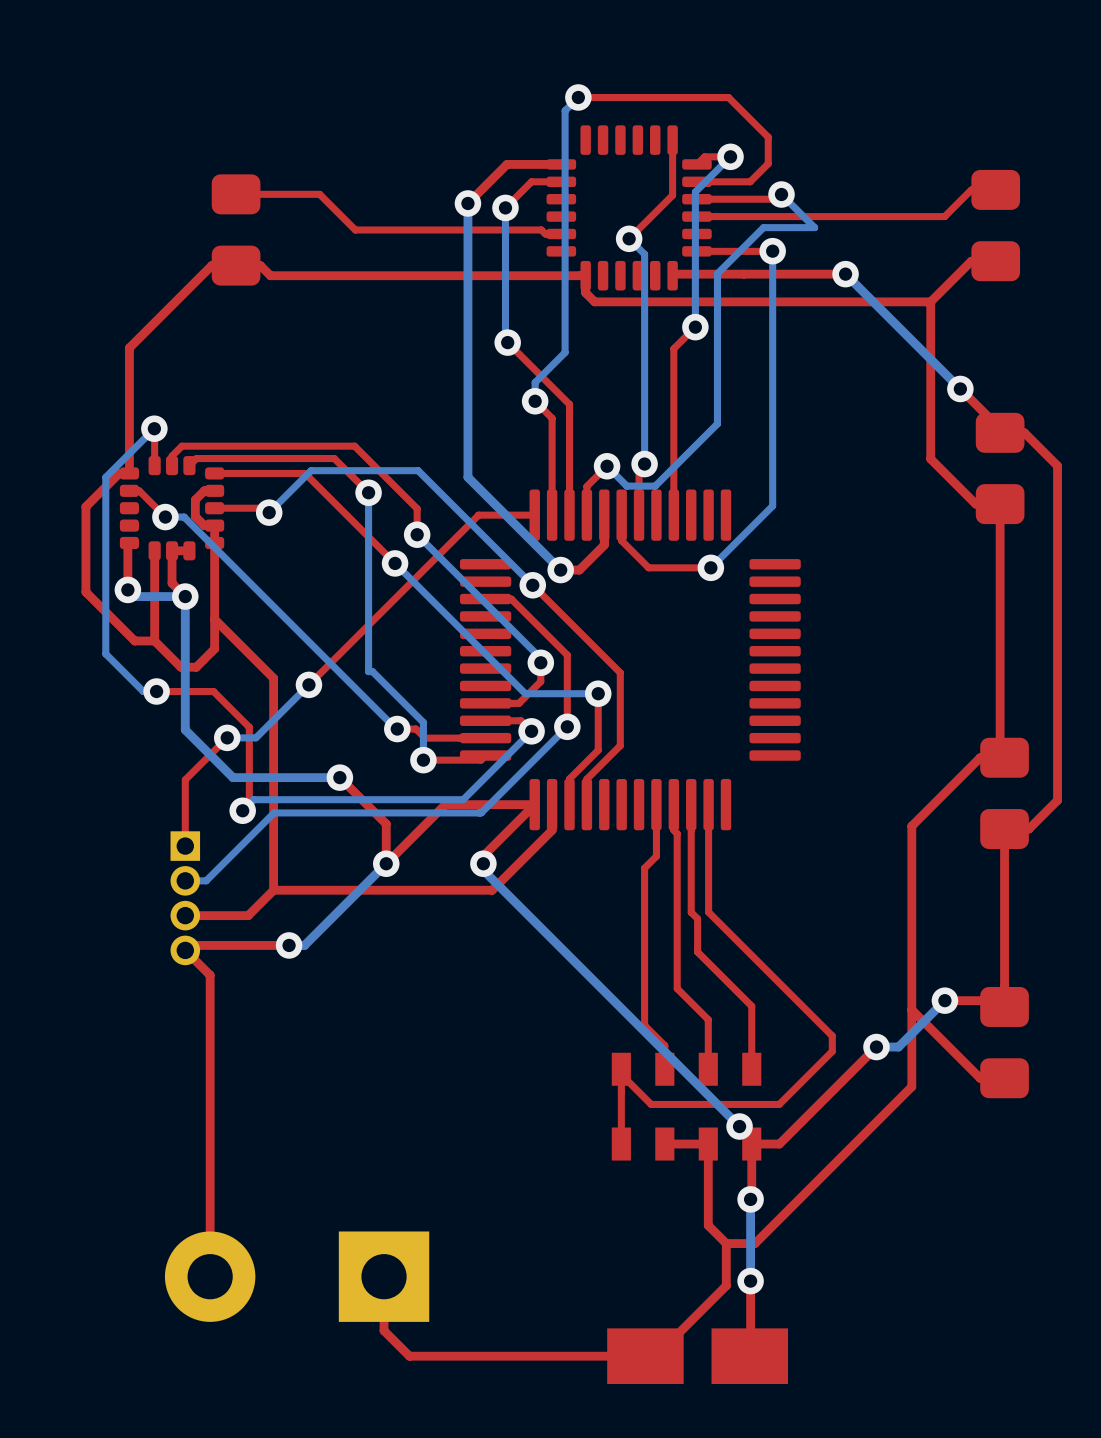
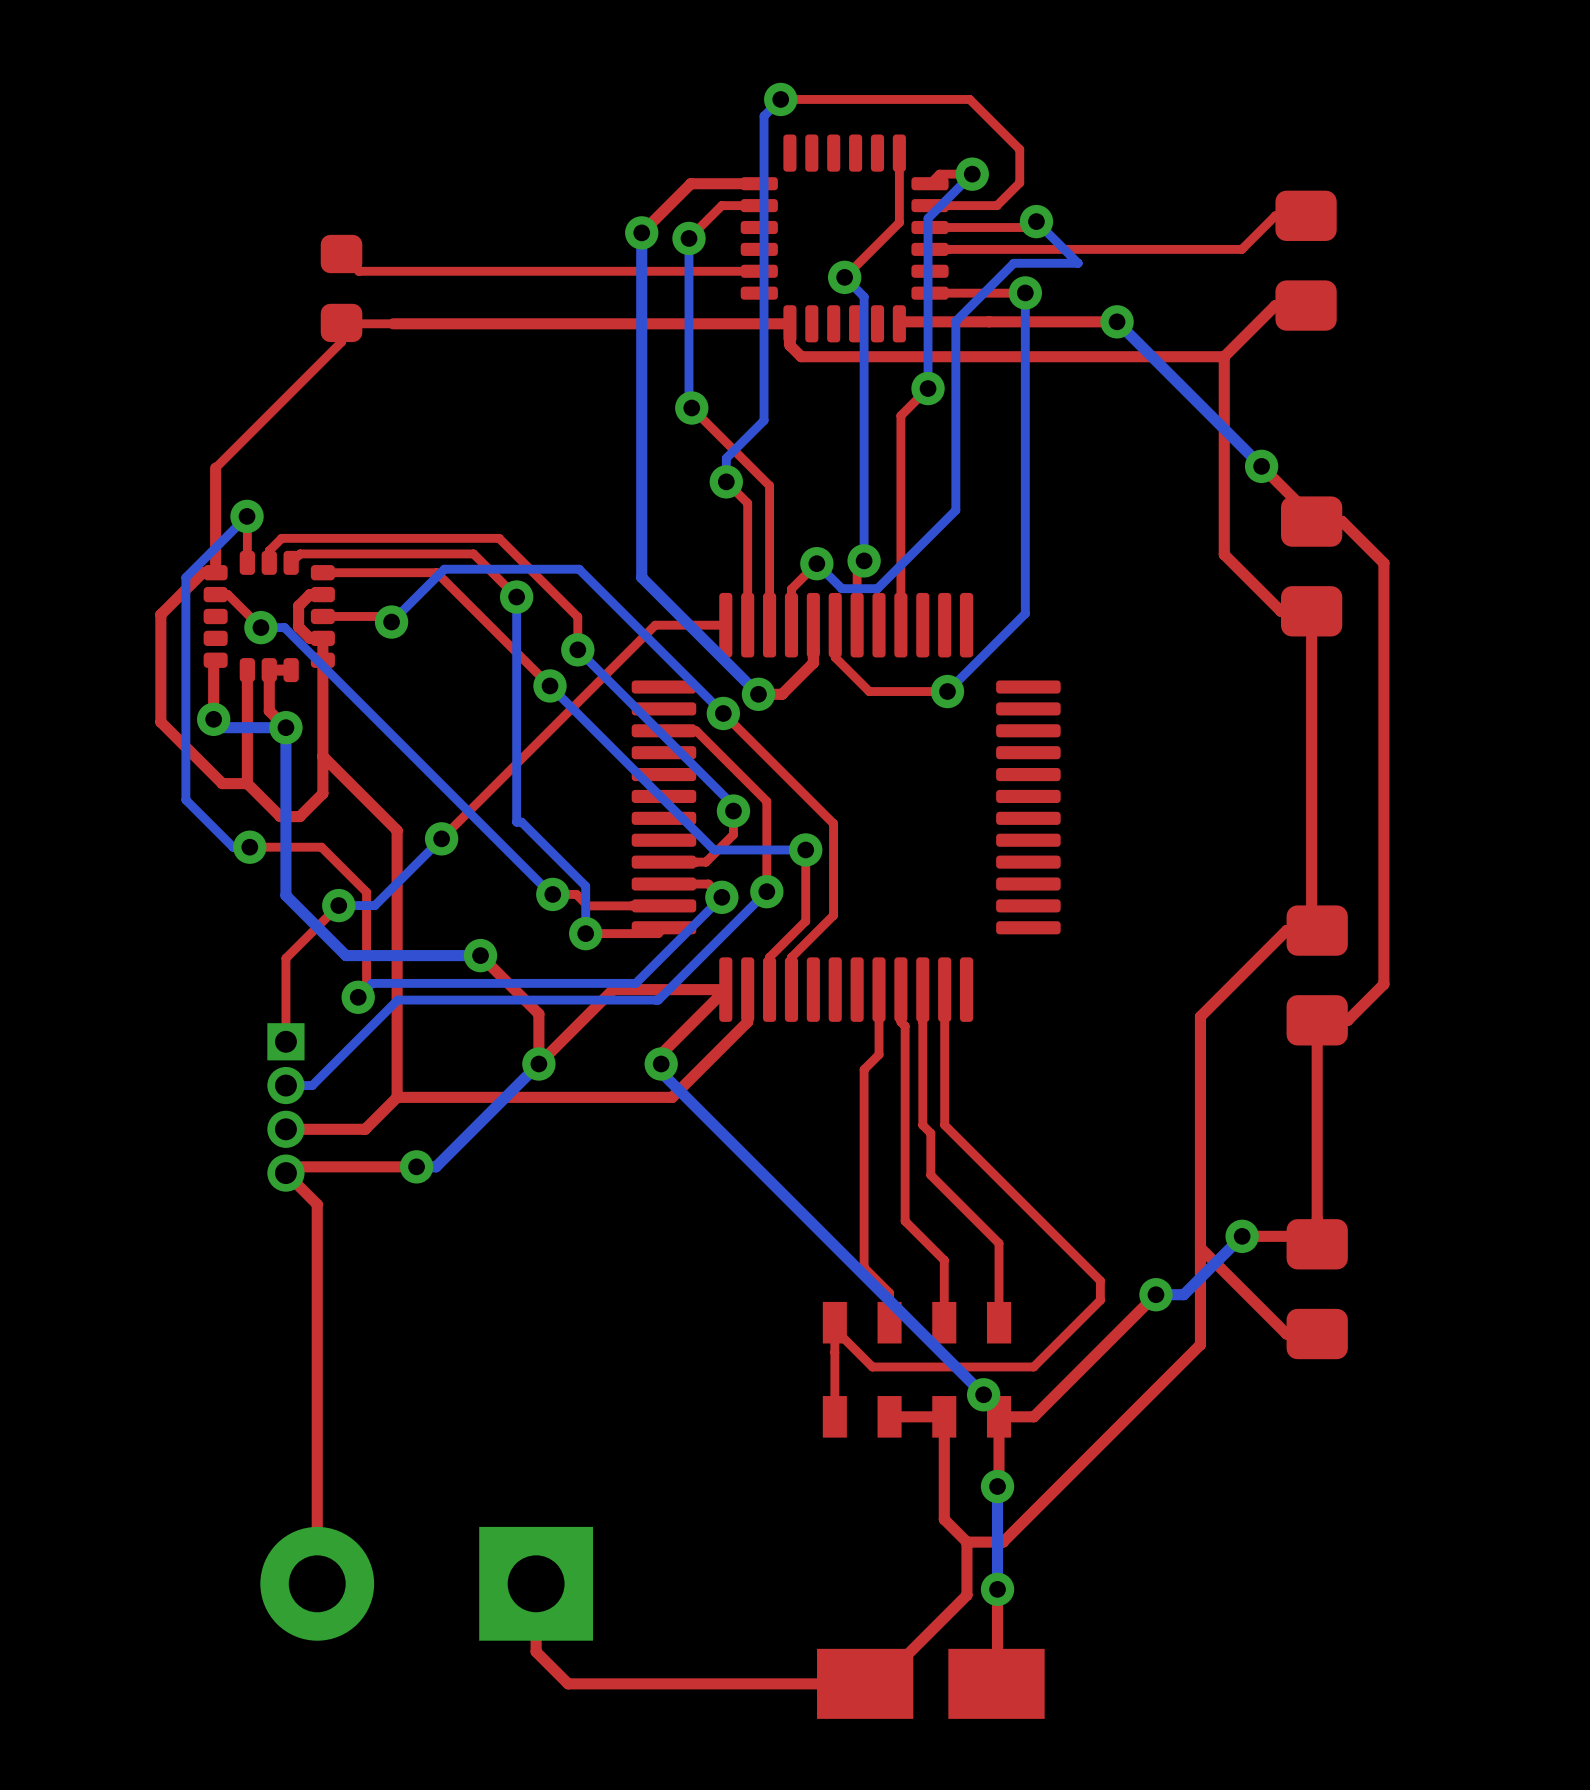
part footprint: [211, 174, 261, 286] -> [320, 234, 363, 343]
top track: (236, 194) (319, 194) (355, 229) (541, 229) (545, 233) -> (341, 254) (358, 271) (739, 271)
top track: (270, 275) (260, 265) (211, 265) (129, 347) (129, 390) -> (393, 323) (341, 322) (341, 342) (215, 467)

